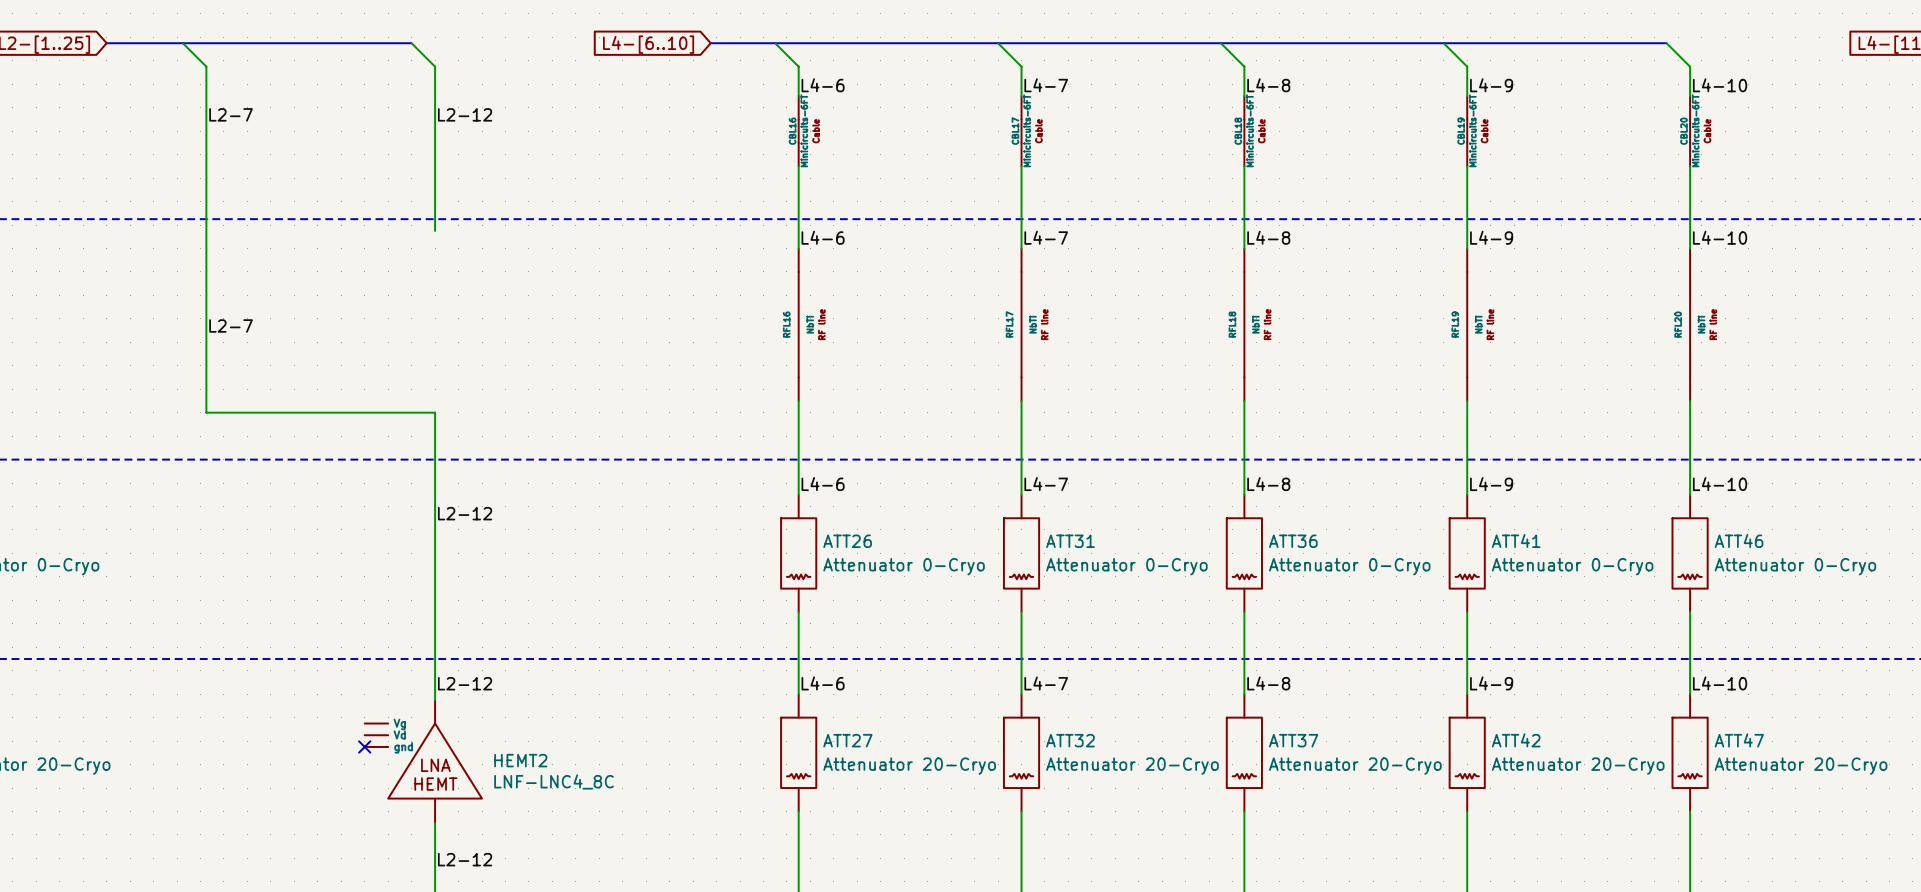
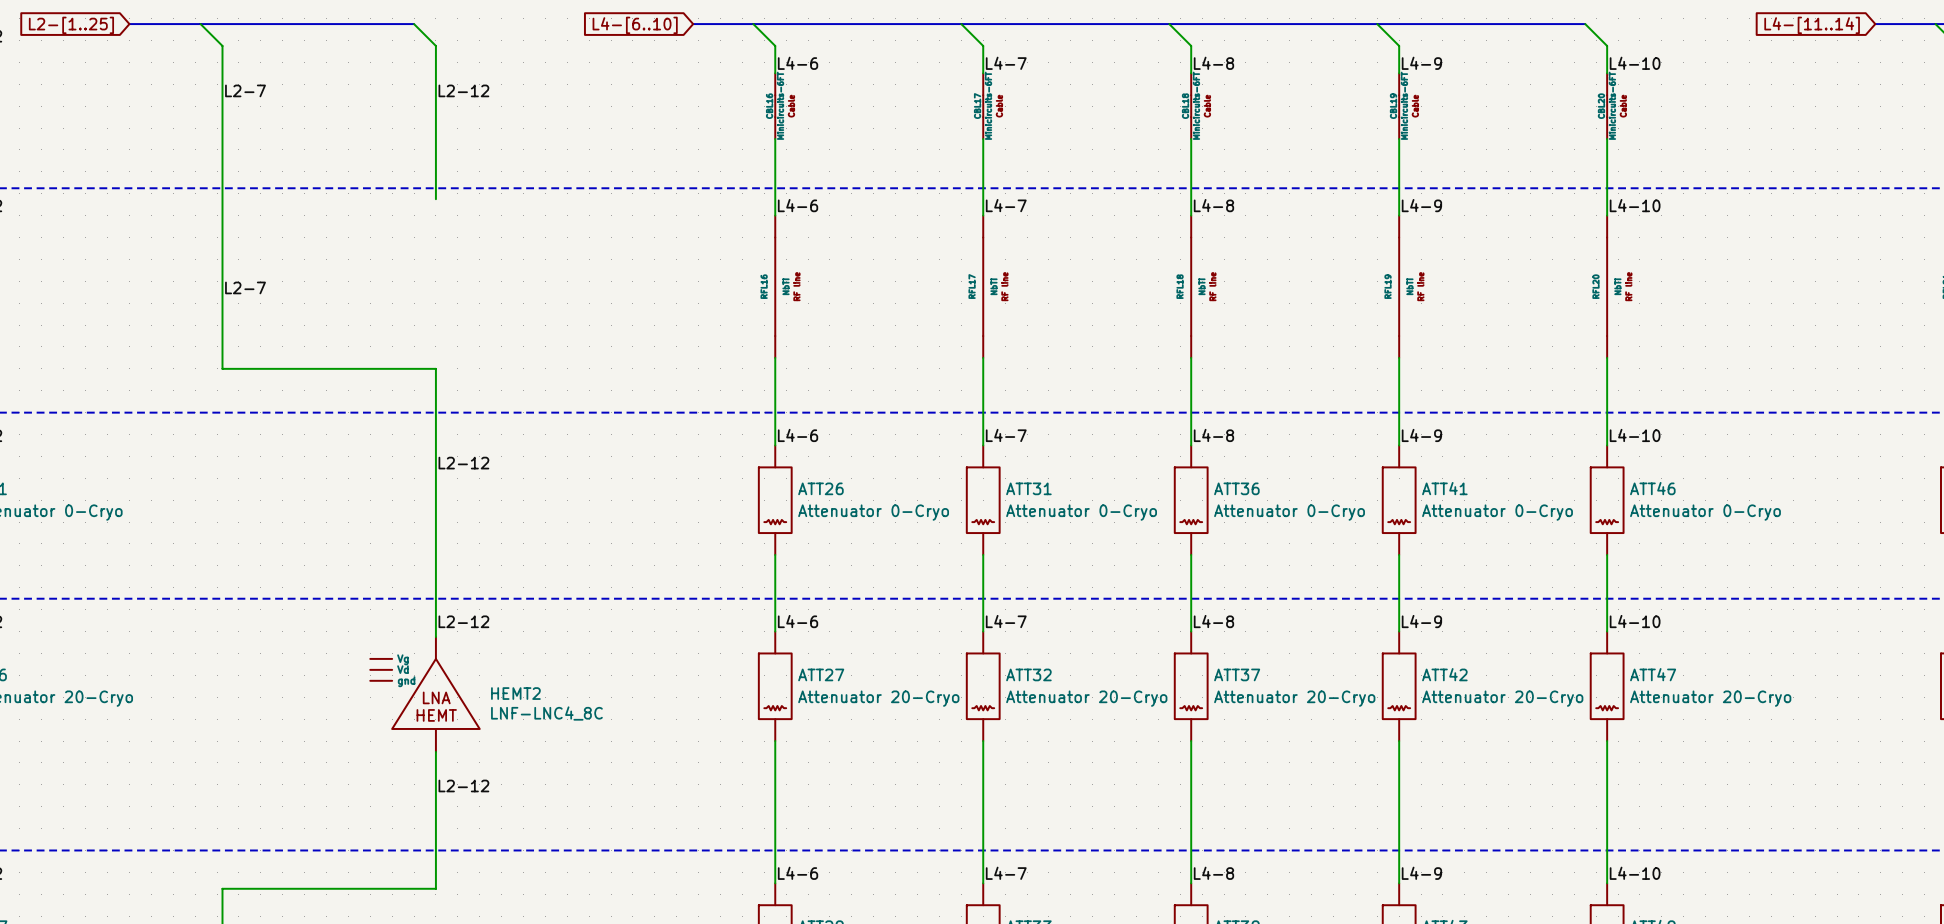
no-connect mark: (364, 746) -> none

